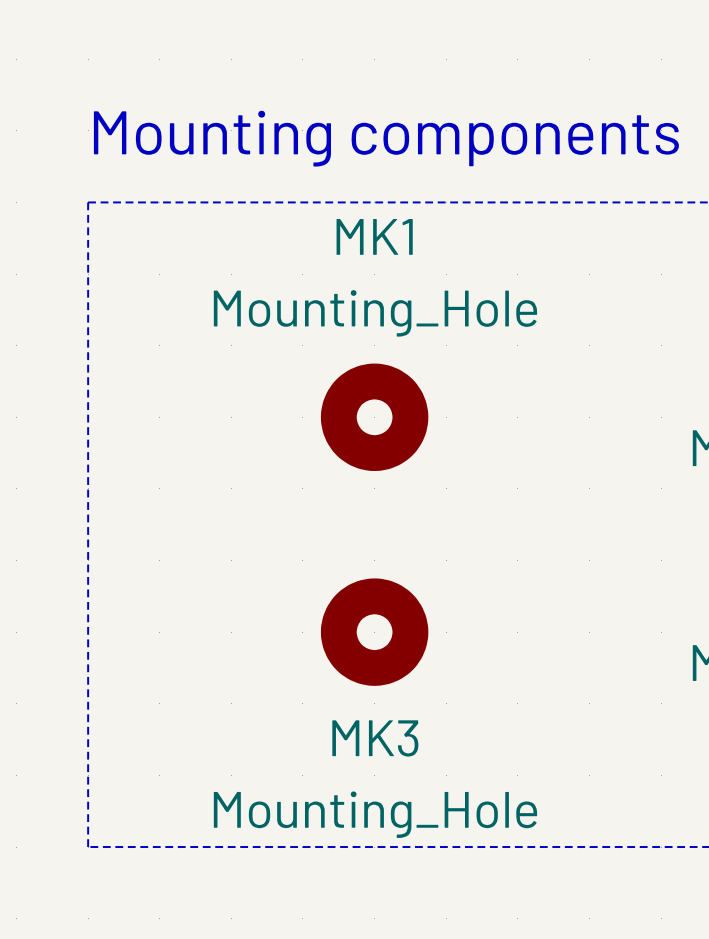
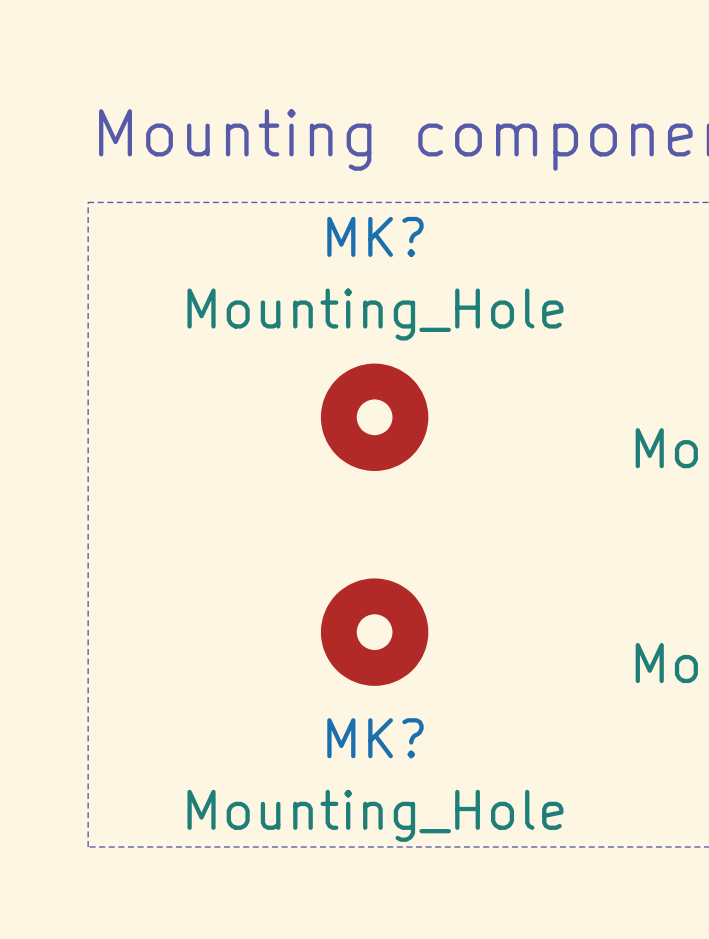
MK1 name: MK1 (374, 236) -> MK? (375, 236)
MK3 name: MK3 (375, 738) -> MK? (375, 738)

